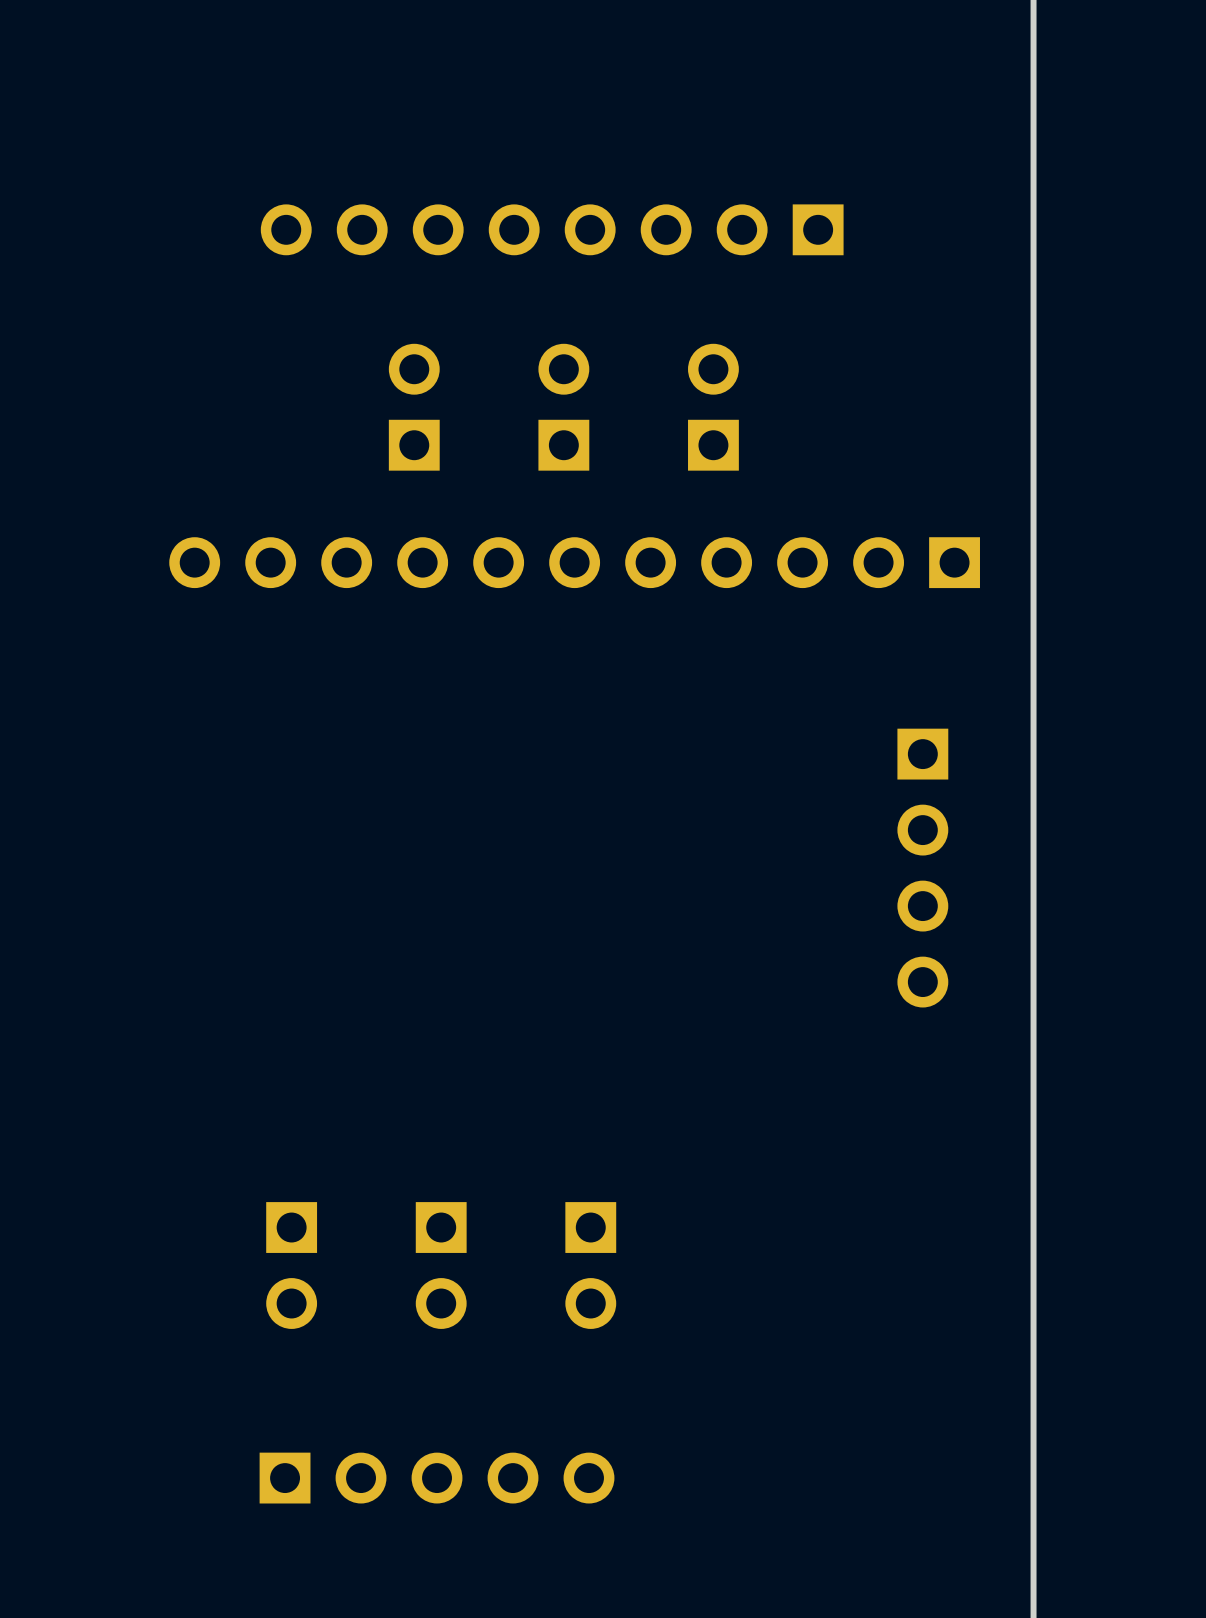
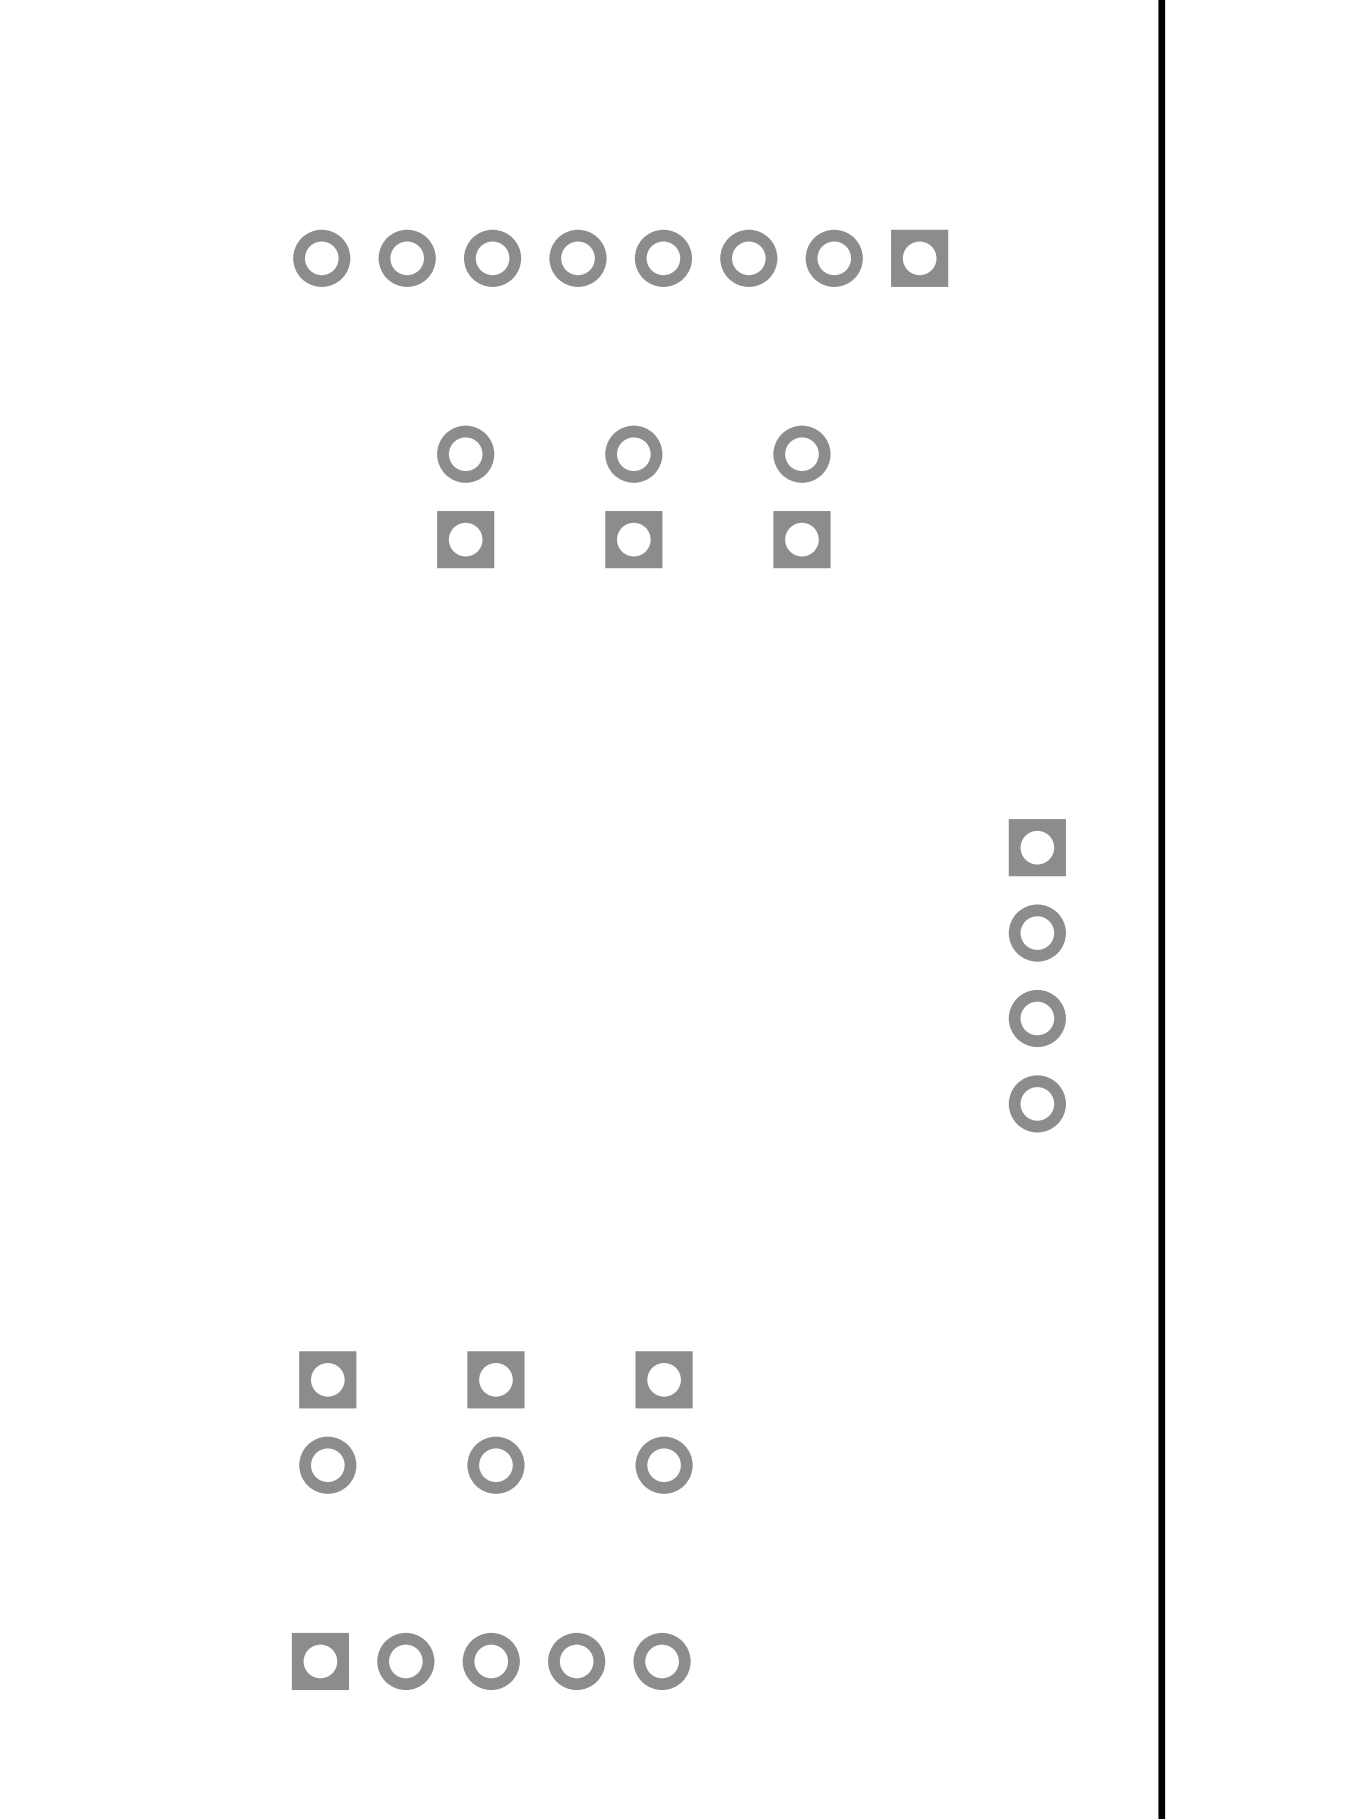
part position: (414, 407) -> (465, 496)
part position: (563, 407) -> (633, 496)
part position: (713, 407) -> (801, 496)
part: (574, 562) -> none

